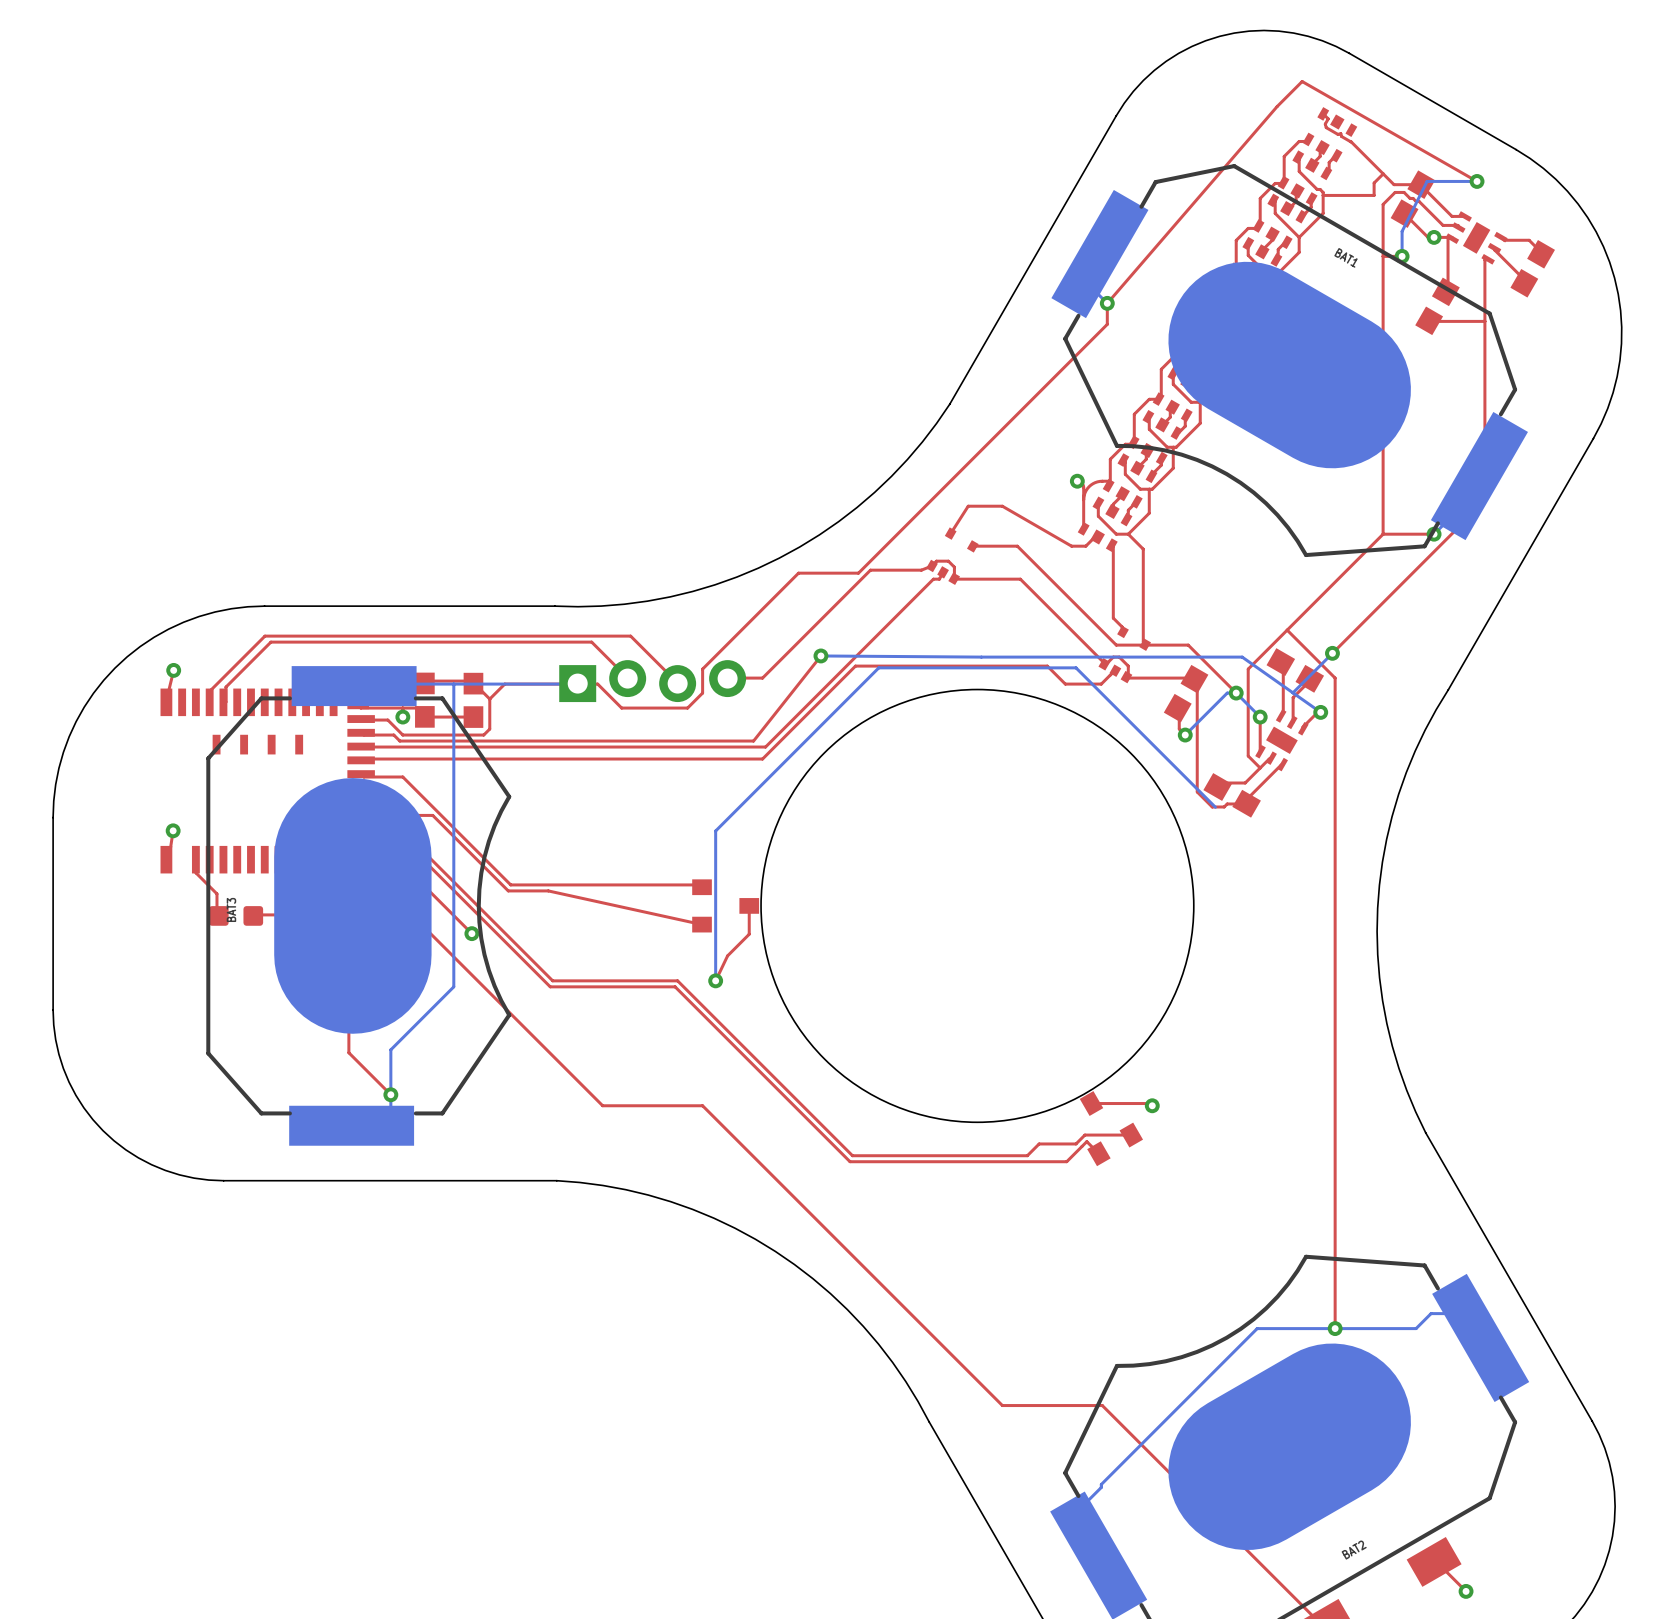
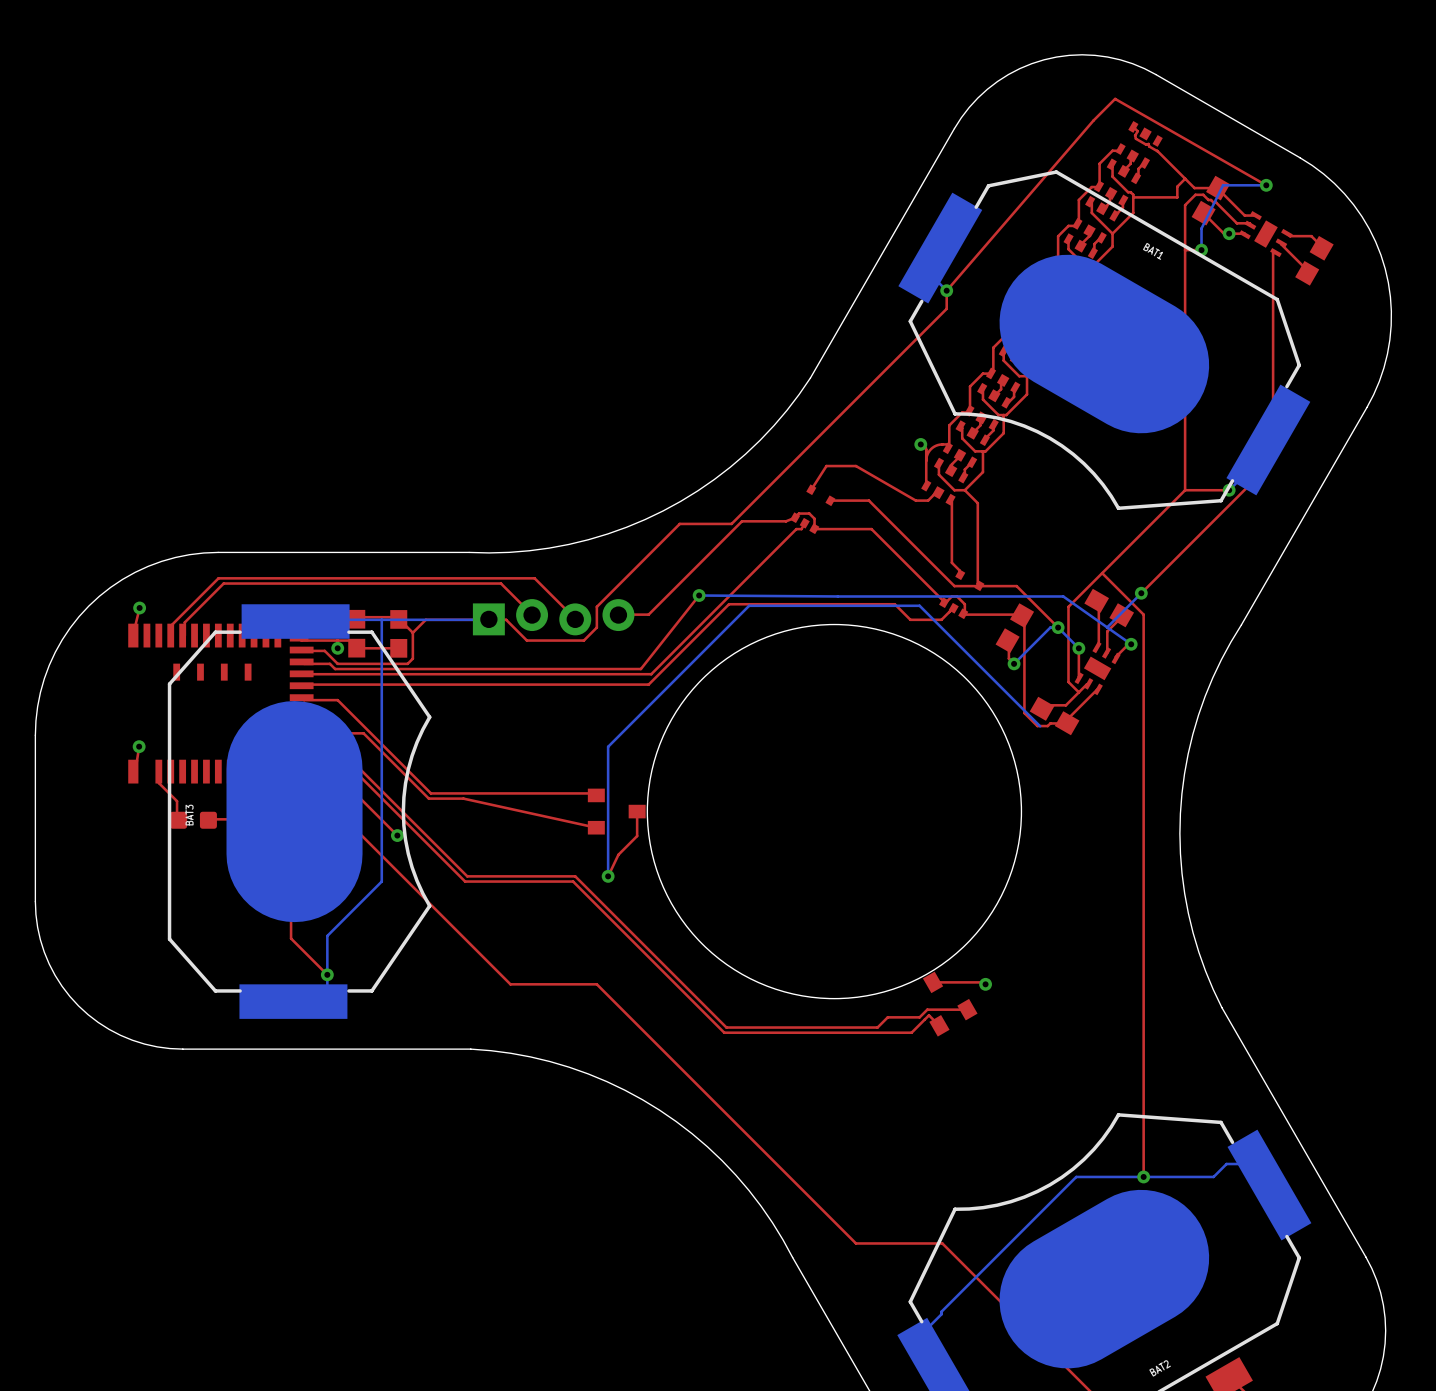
top track: (1452, 238) (1448, 237) (1448, 289) (1445, 291) -> none
part: (1437, 306) -> none
top track: (1429, 320) (1484, 321) -> none

